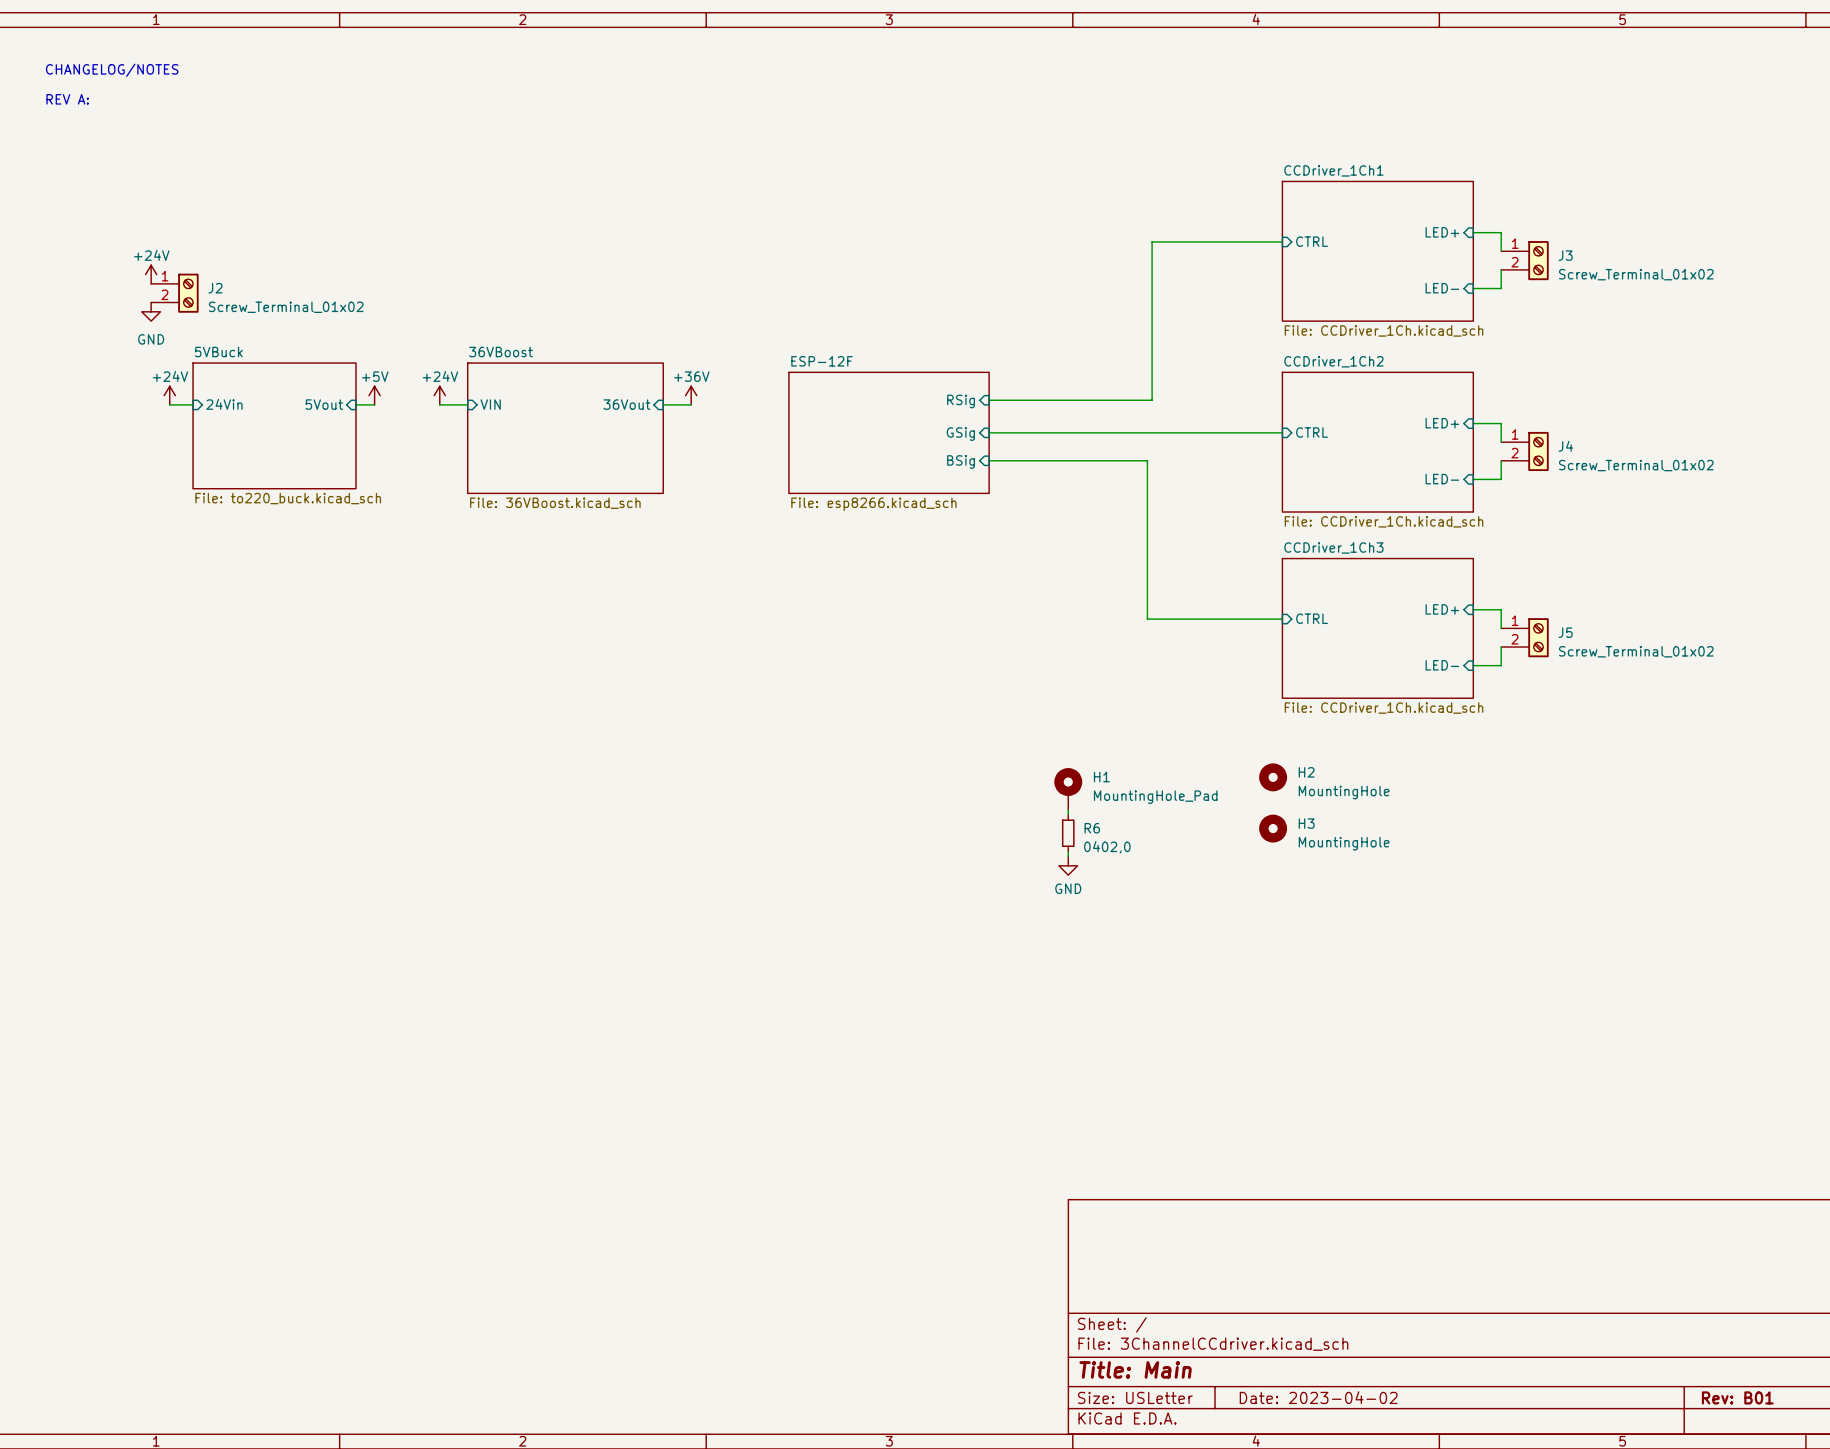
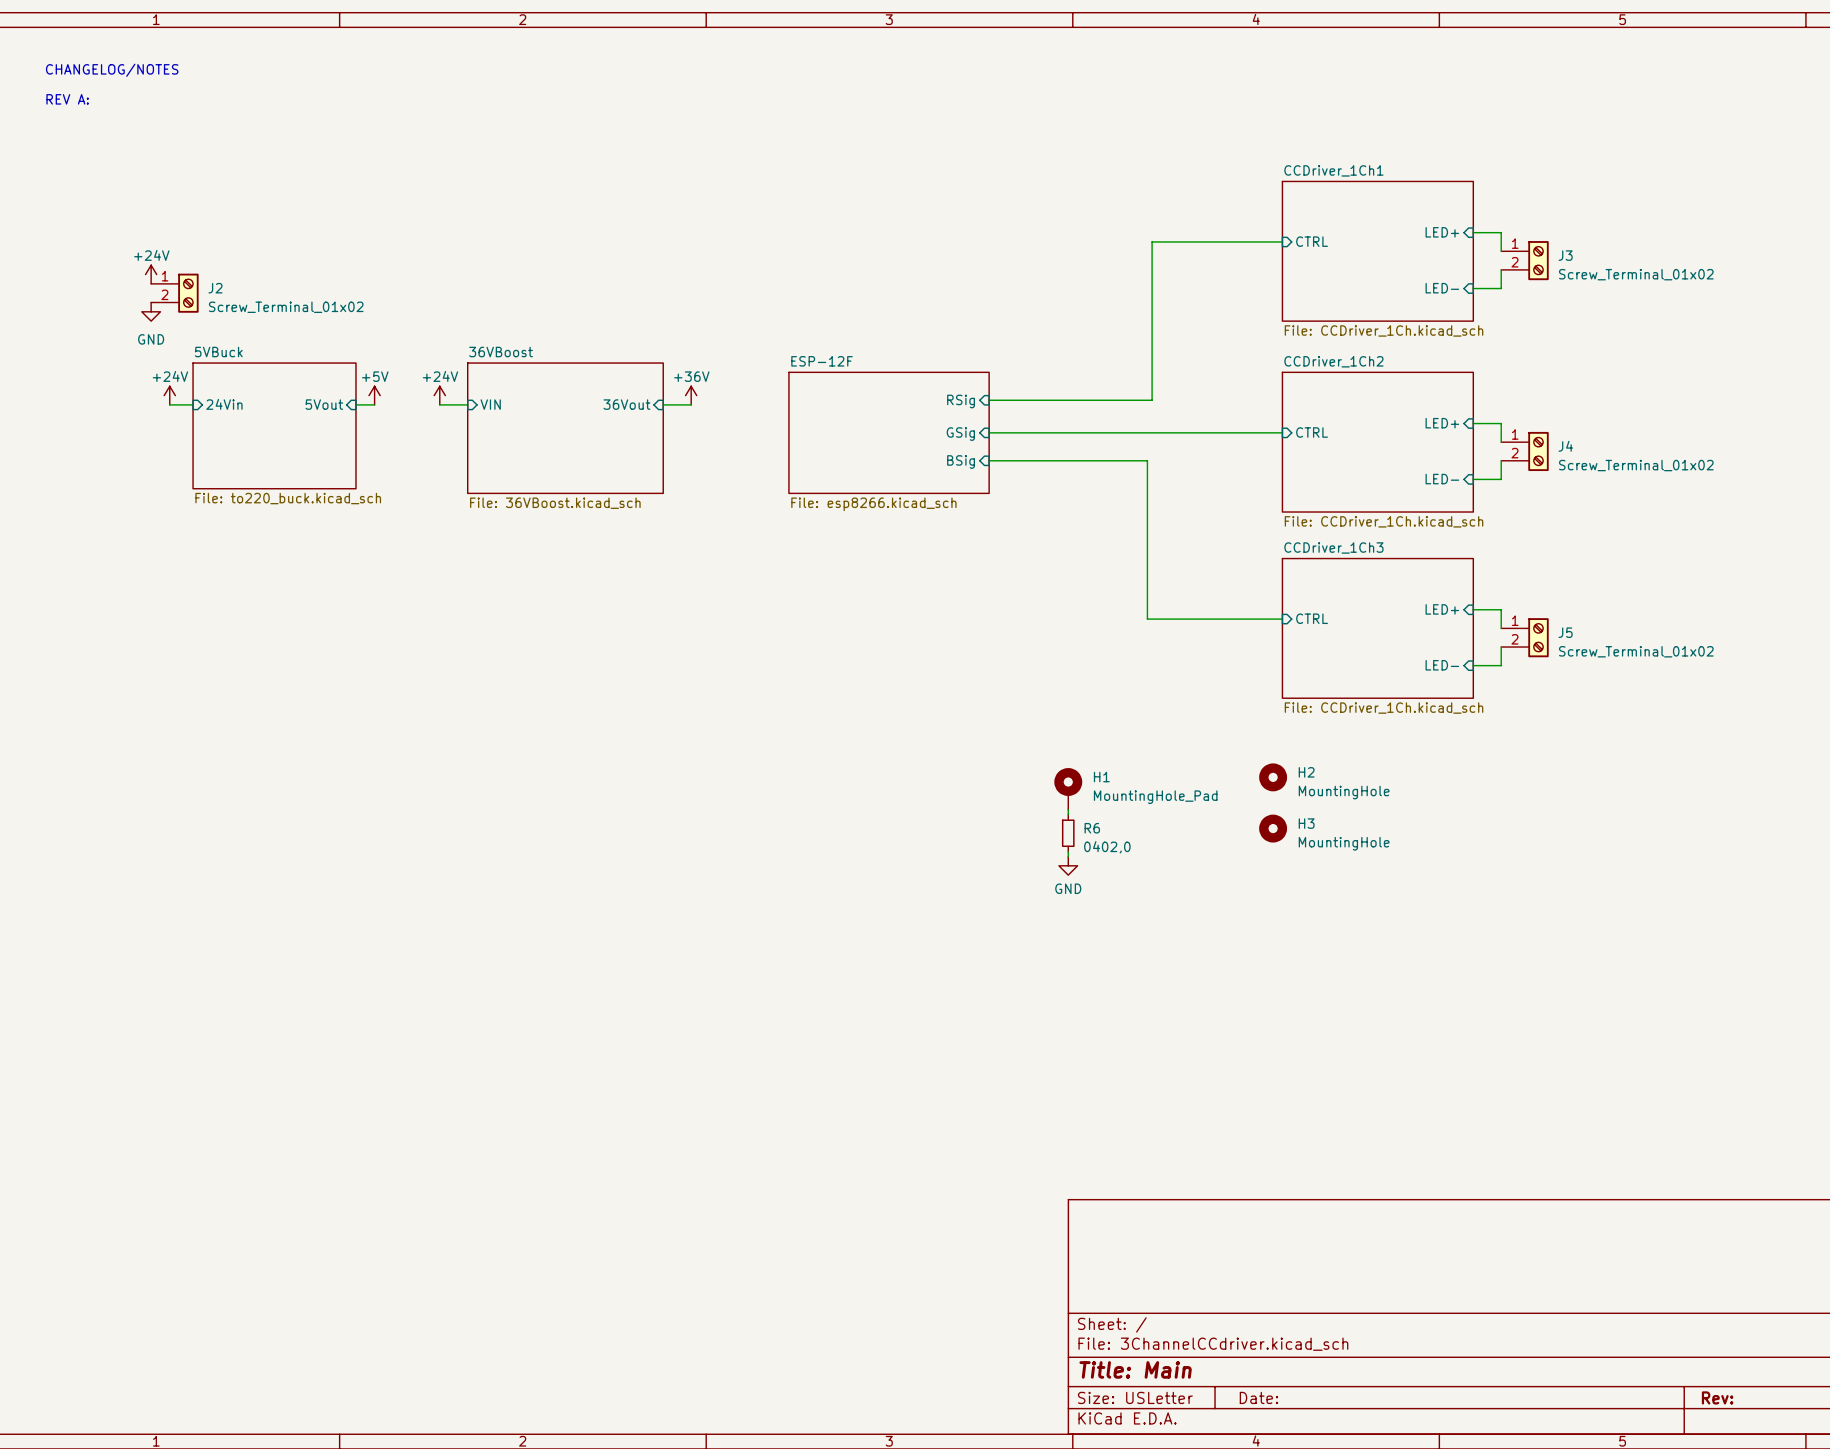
title block: Date: 2023-04-02 (1318, 1397) -> Date: (1258, 1397)
title block: Rev: B01 (1737, 1397) -> Rev: (1717, 1397)

